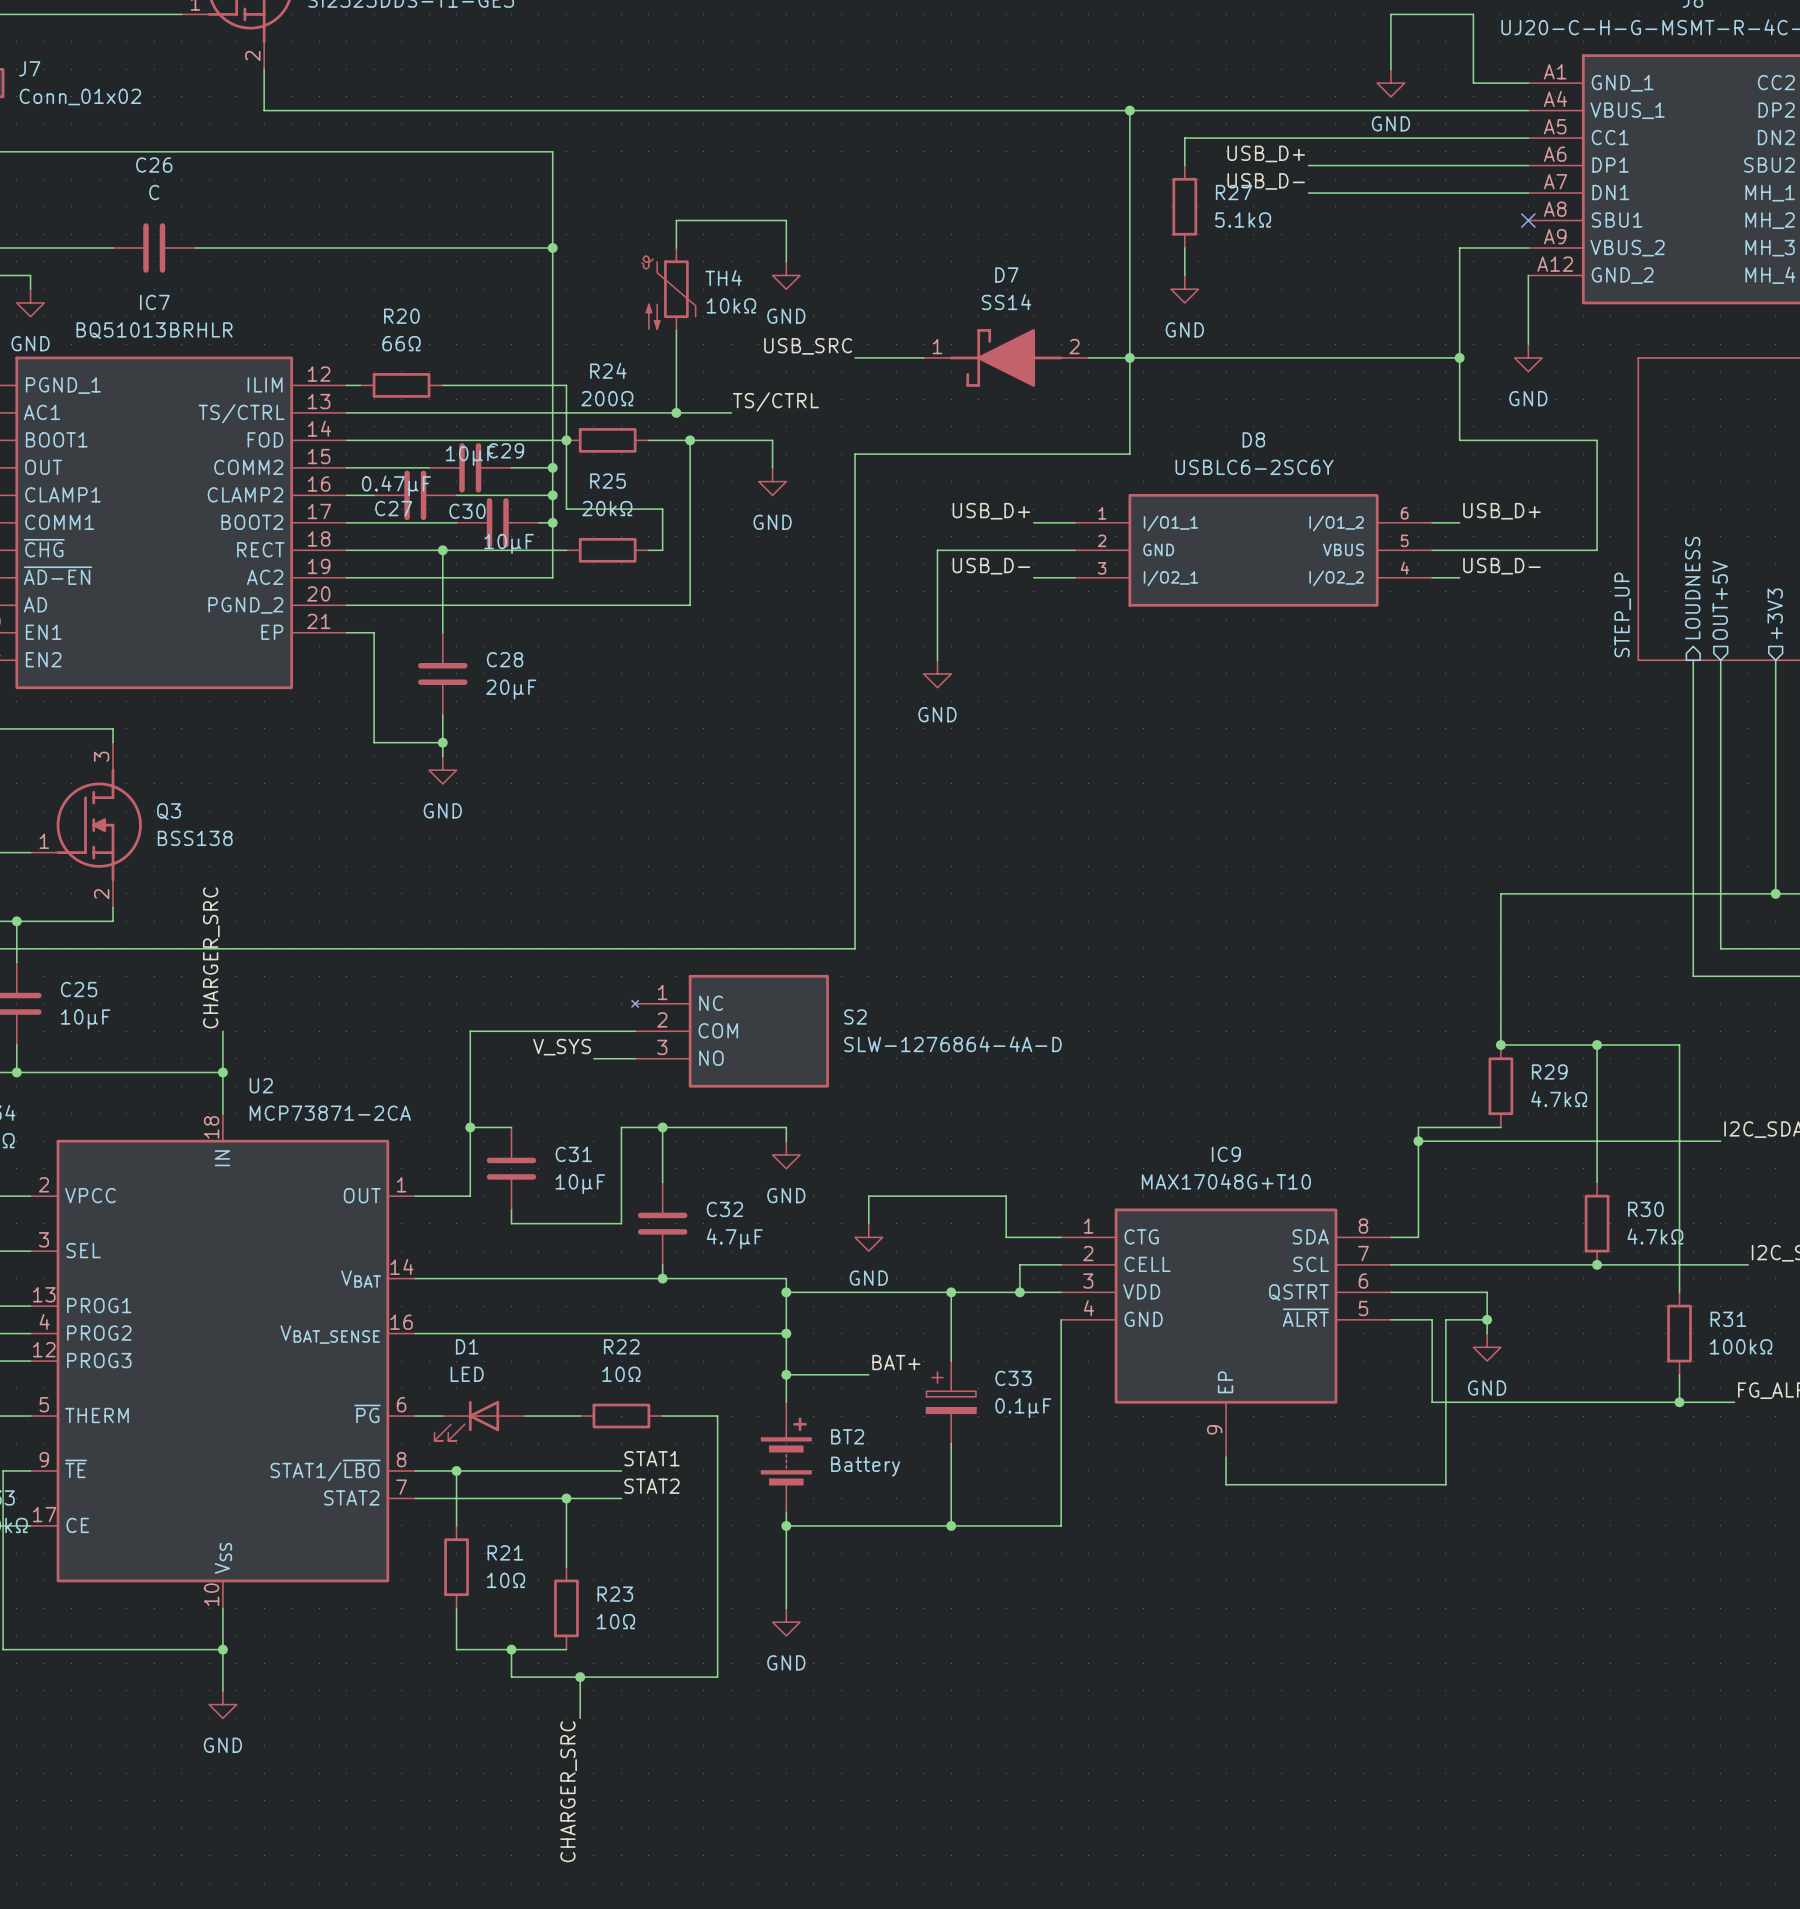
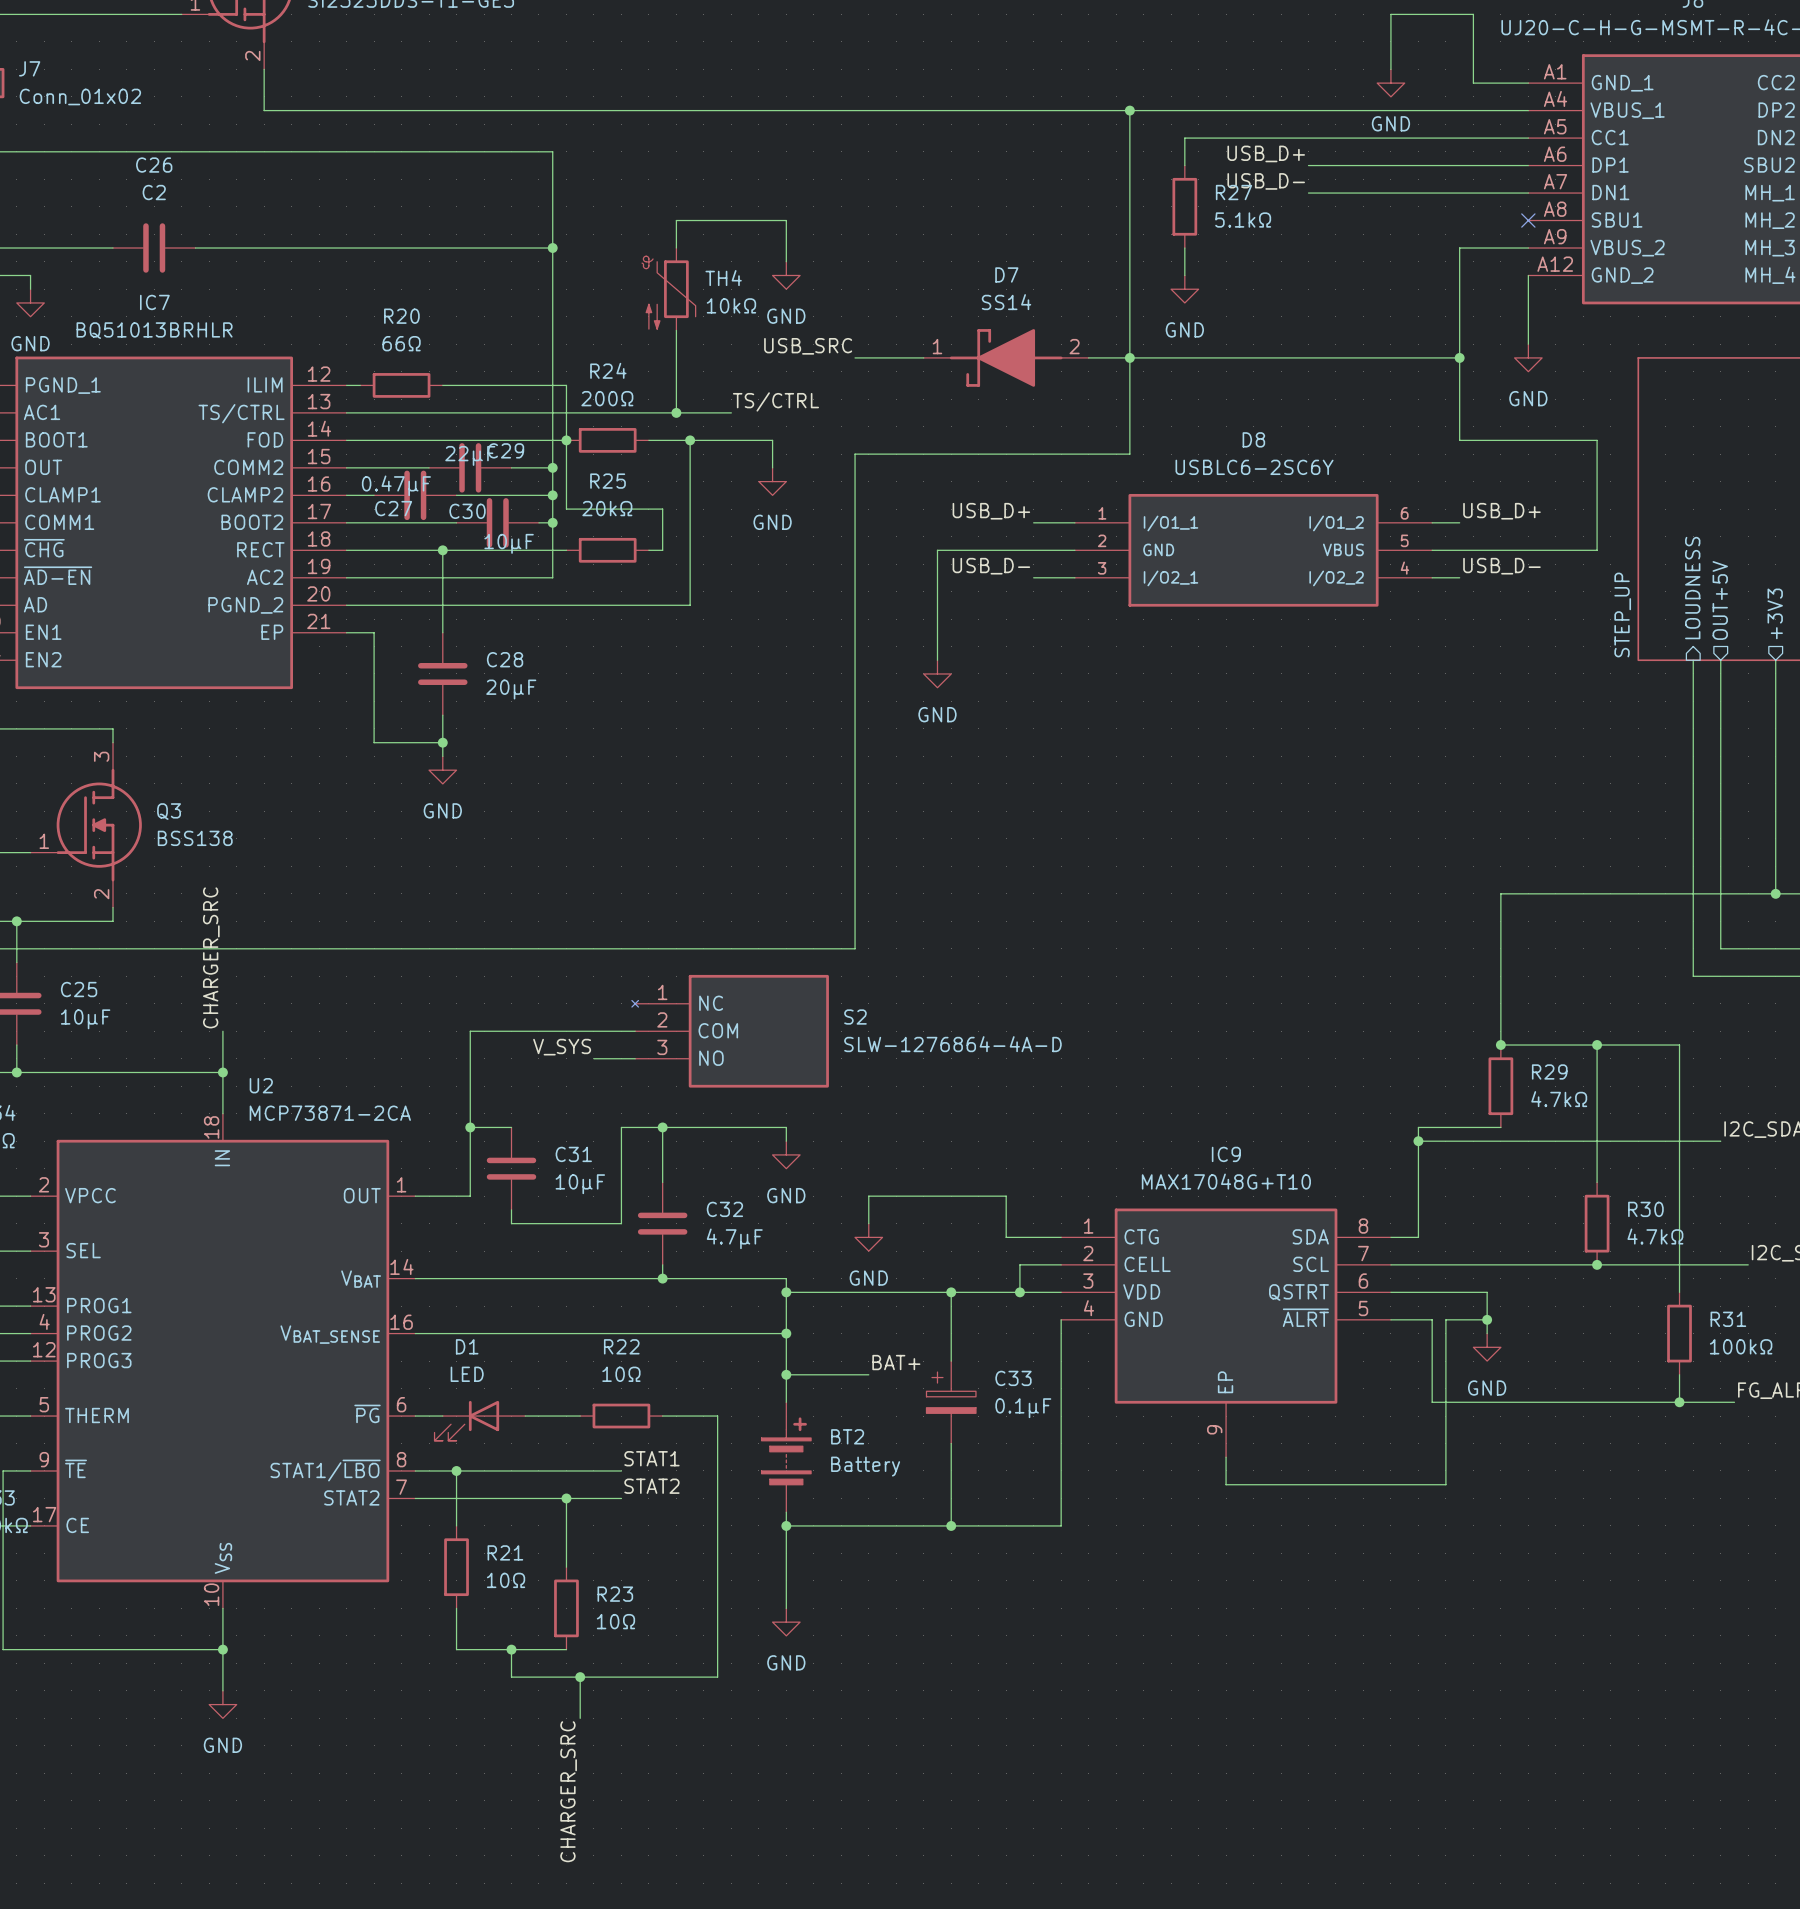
C26 value: C (154, 192) -> C2 (154, 192)
C29 value: 10µF (470, 455) -> 22µF (470, 455)

